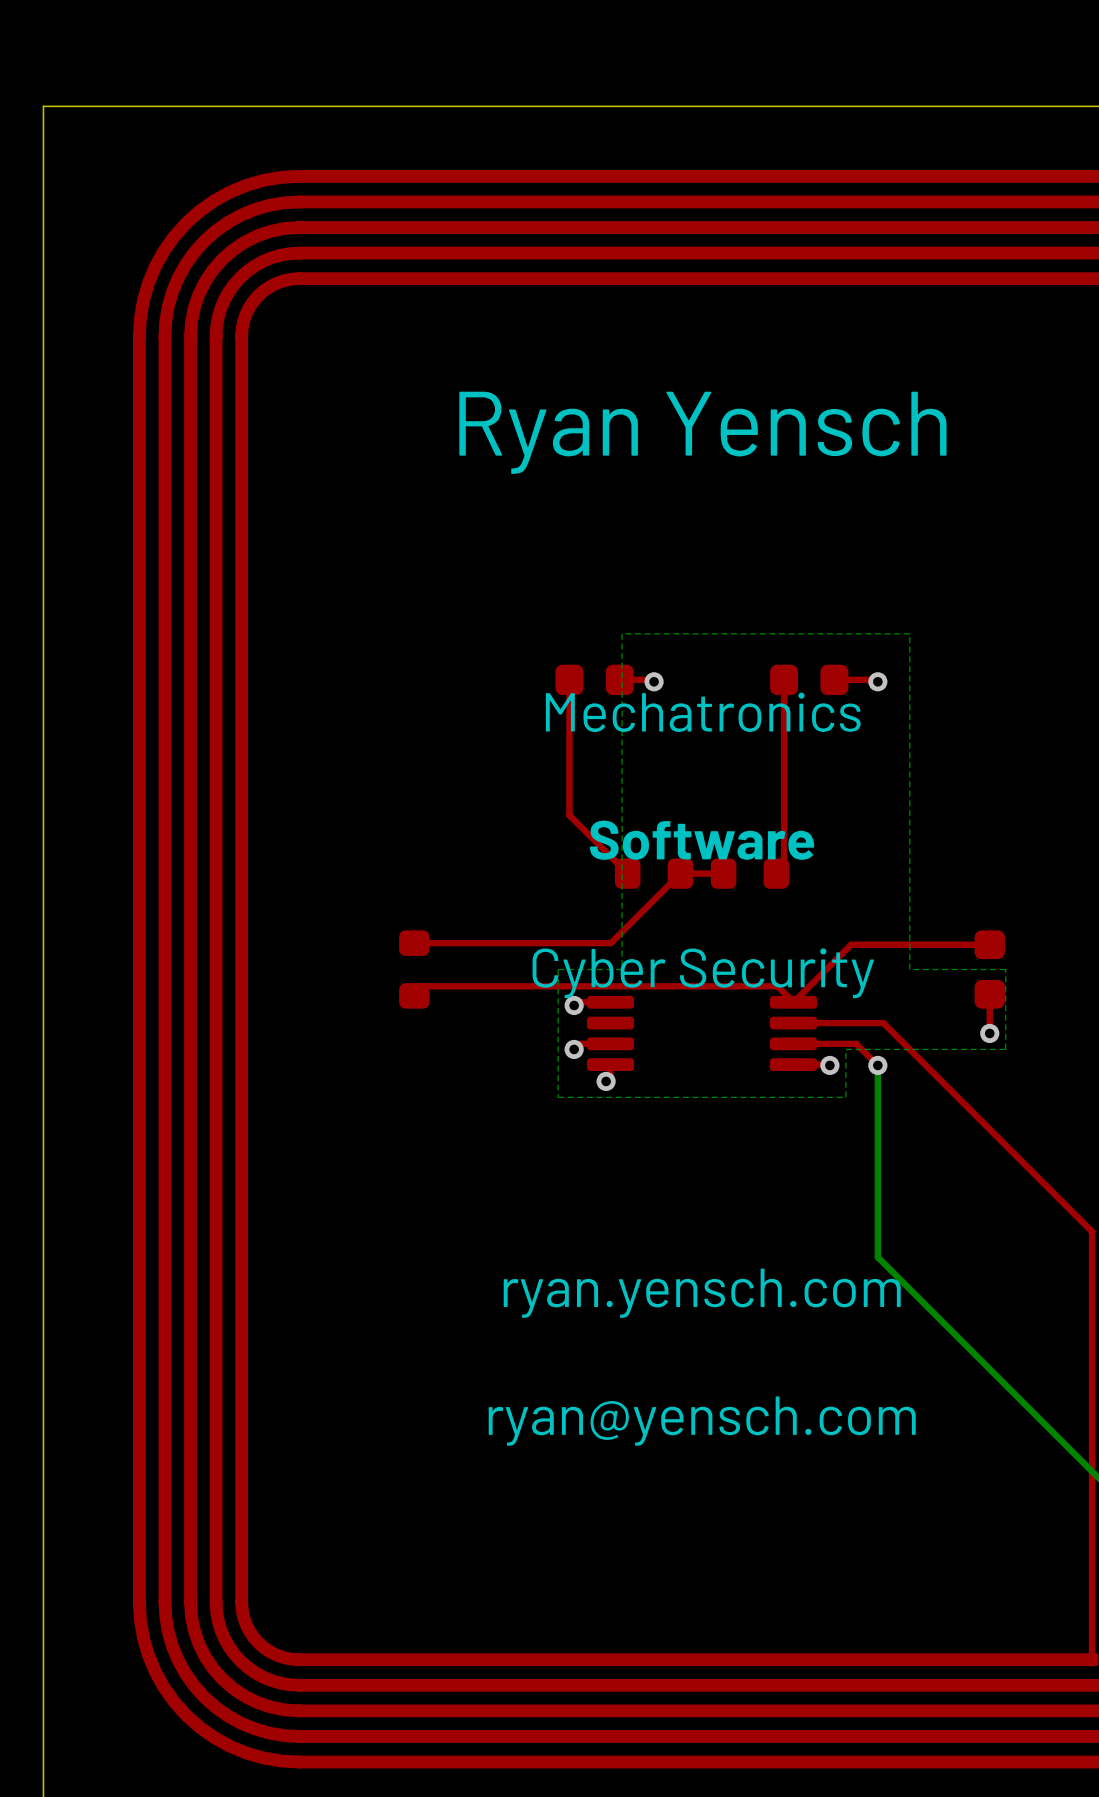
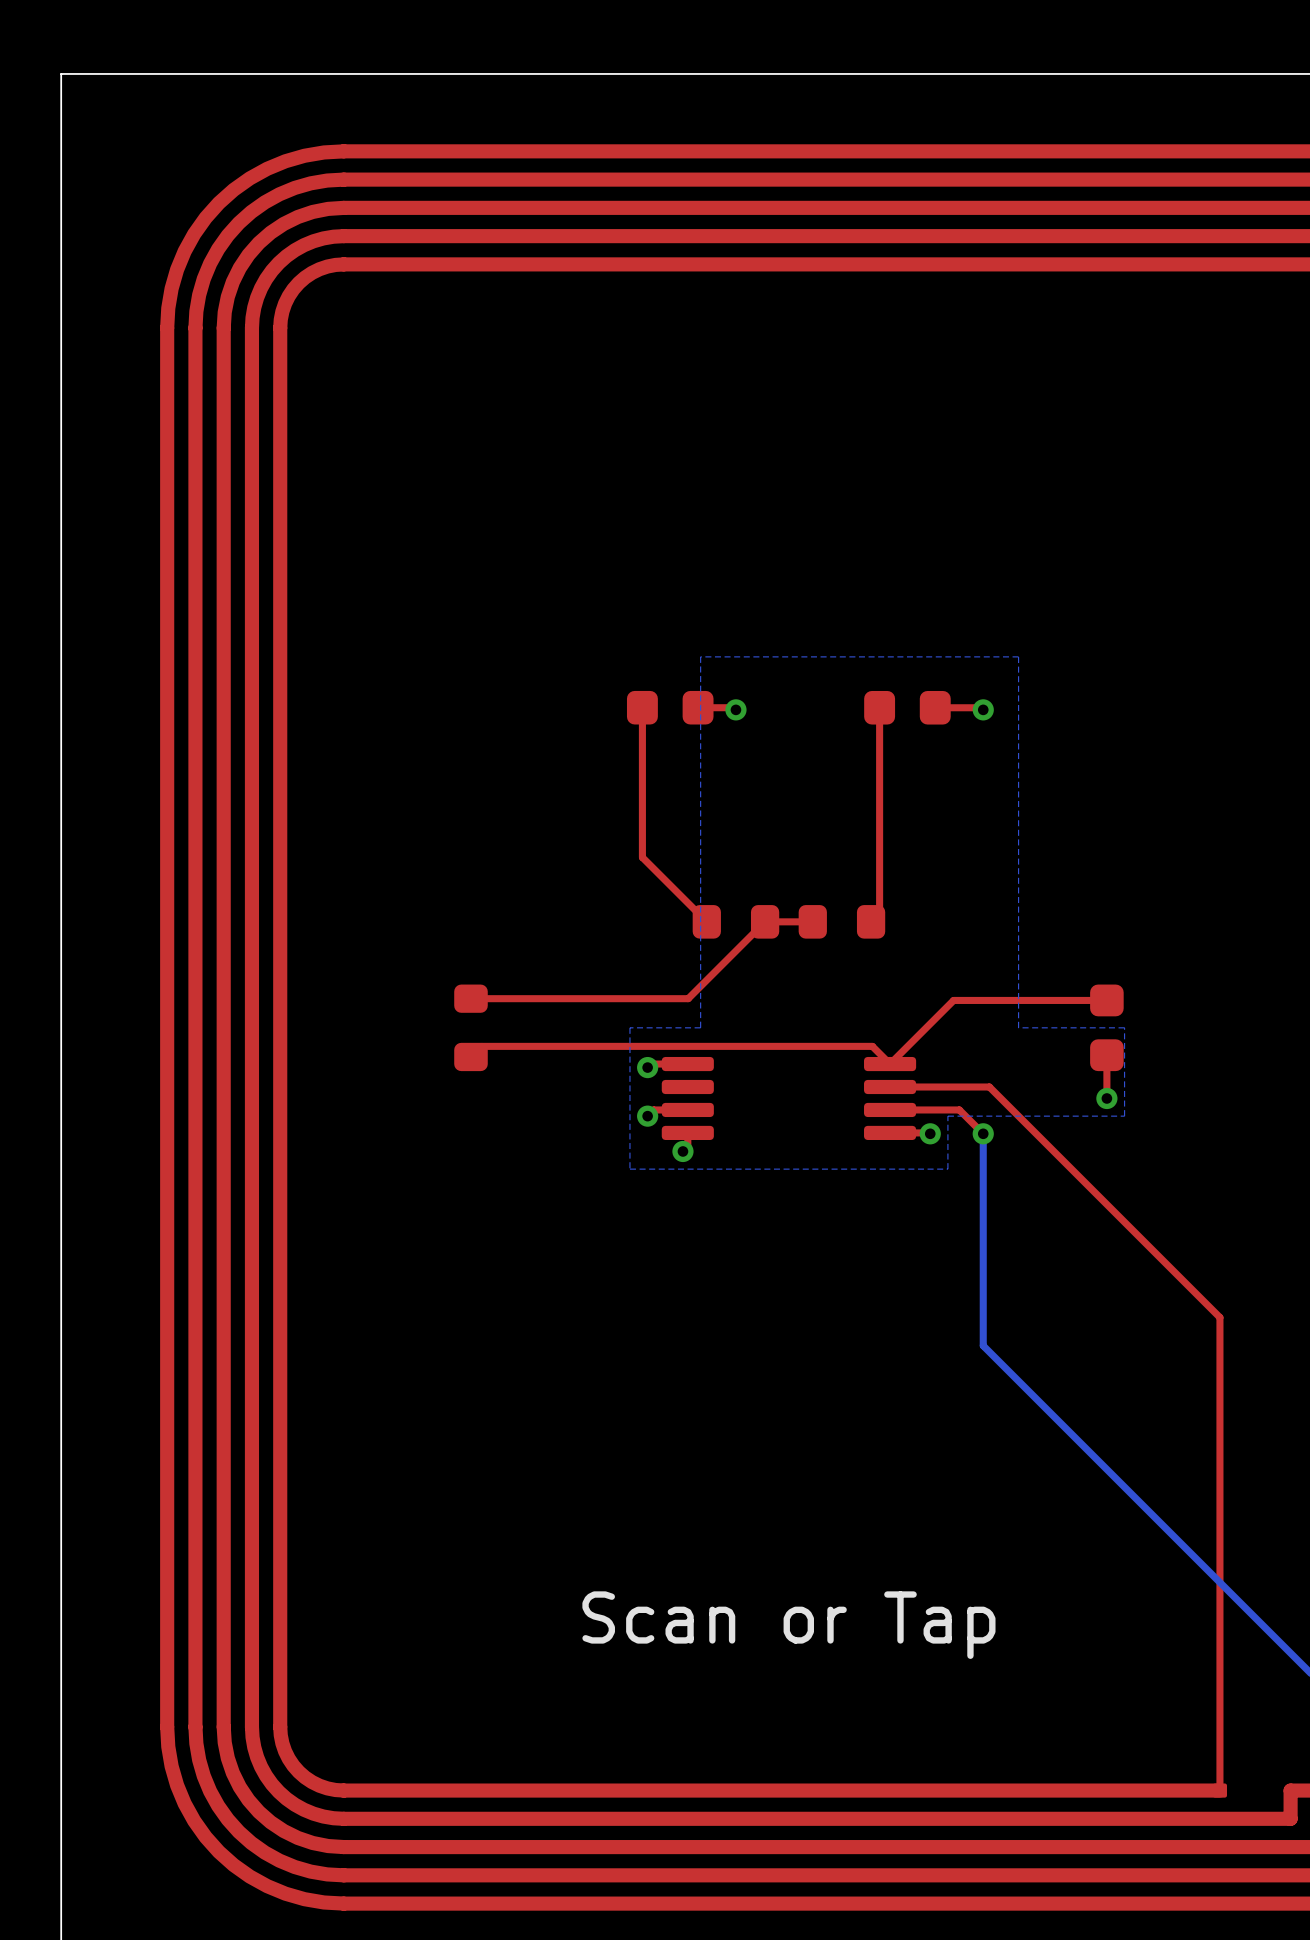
text: Ryan Yensch (702, 432) -> none
text: Mechatronics (703, 712) -> none
text: Software (702, 840) -> none
text: Cyber Security (703, 973) -> none
text: ryan.yensch.com (702, 1293) -> none
text: ryan@yensch.com (702, 1421) -> none
text: none -> Scan or Tap (788, 1625)

